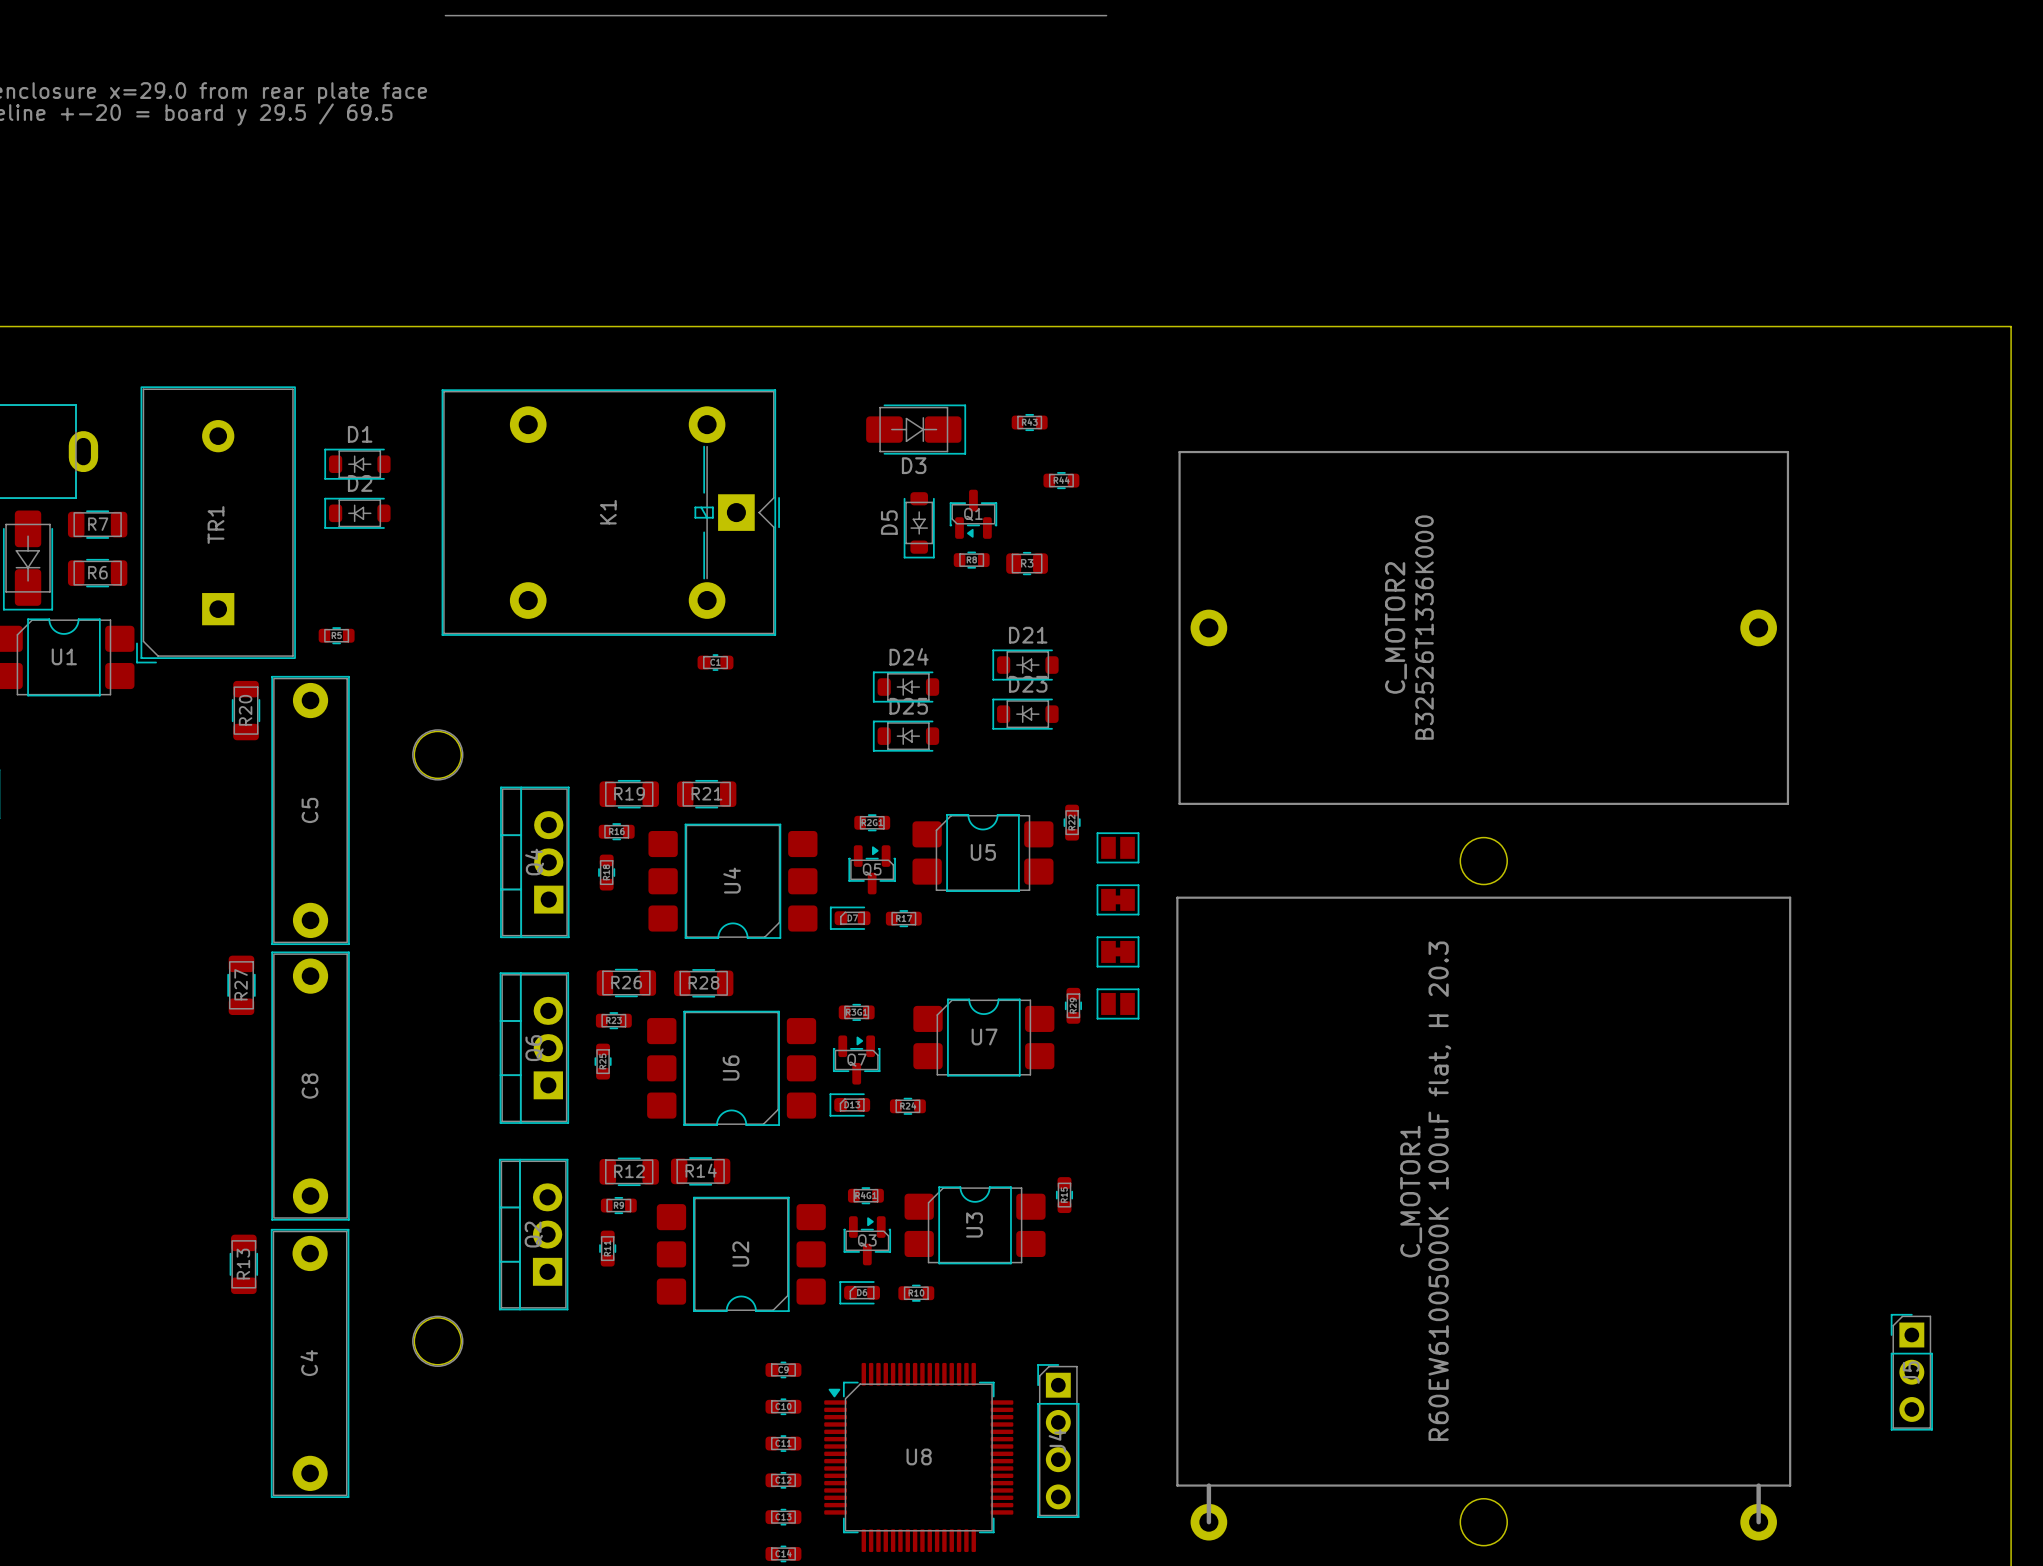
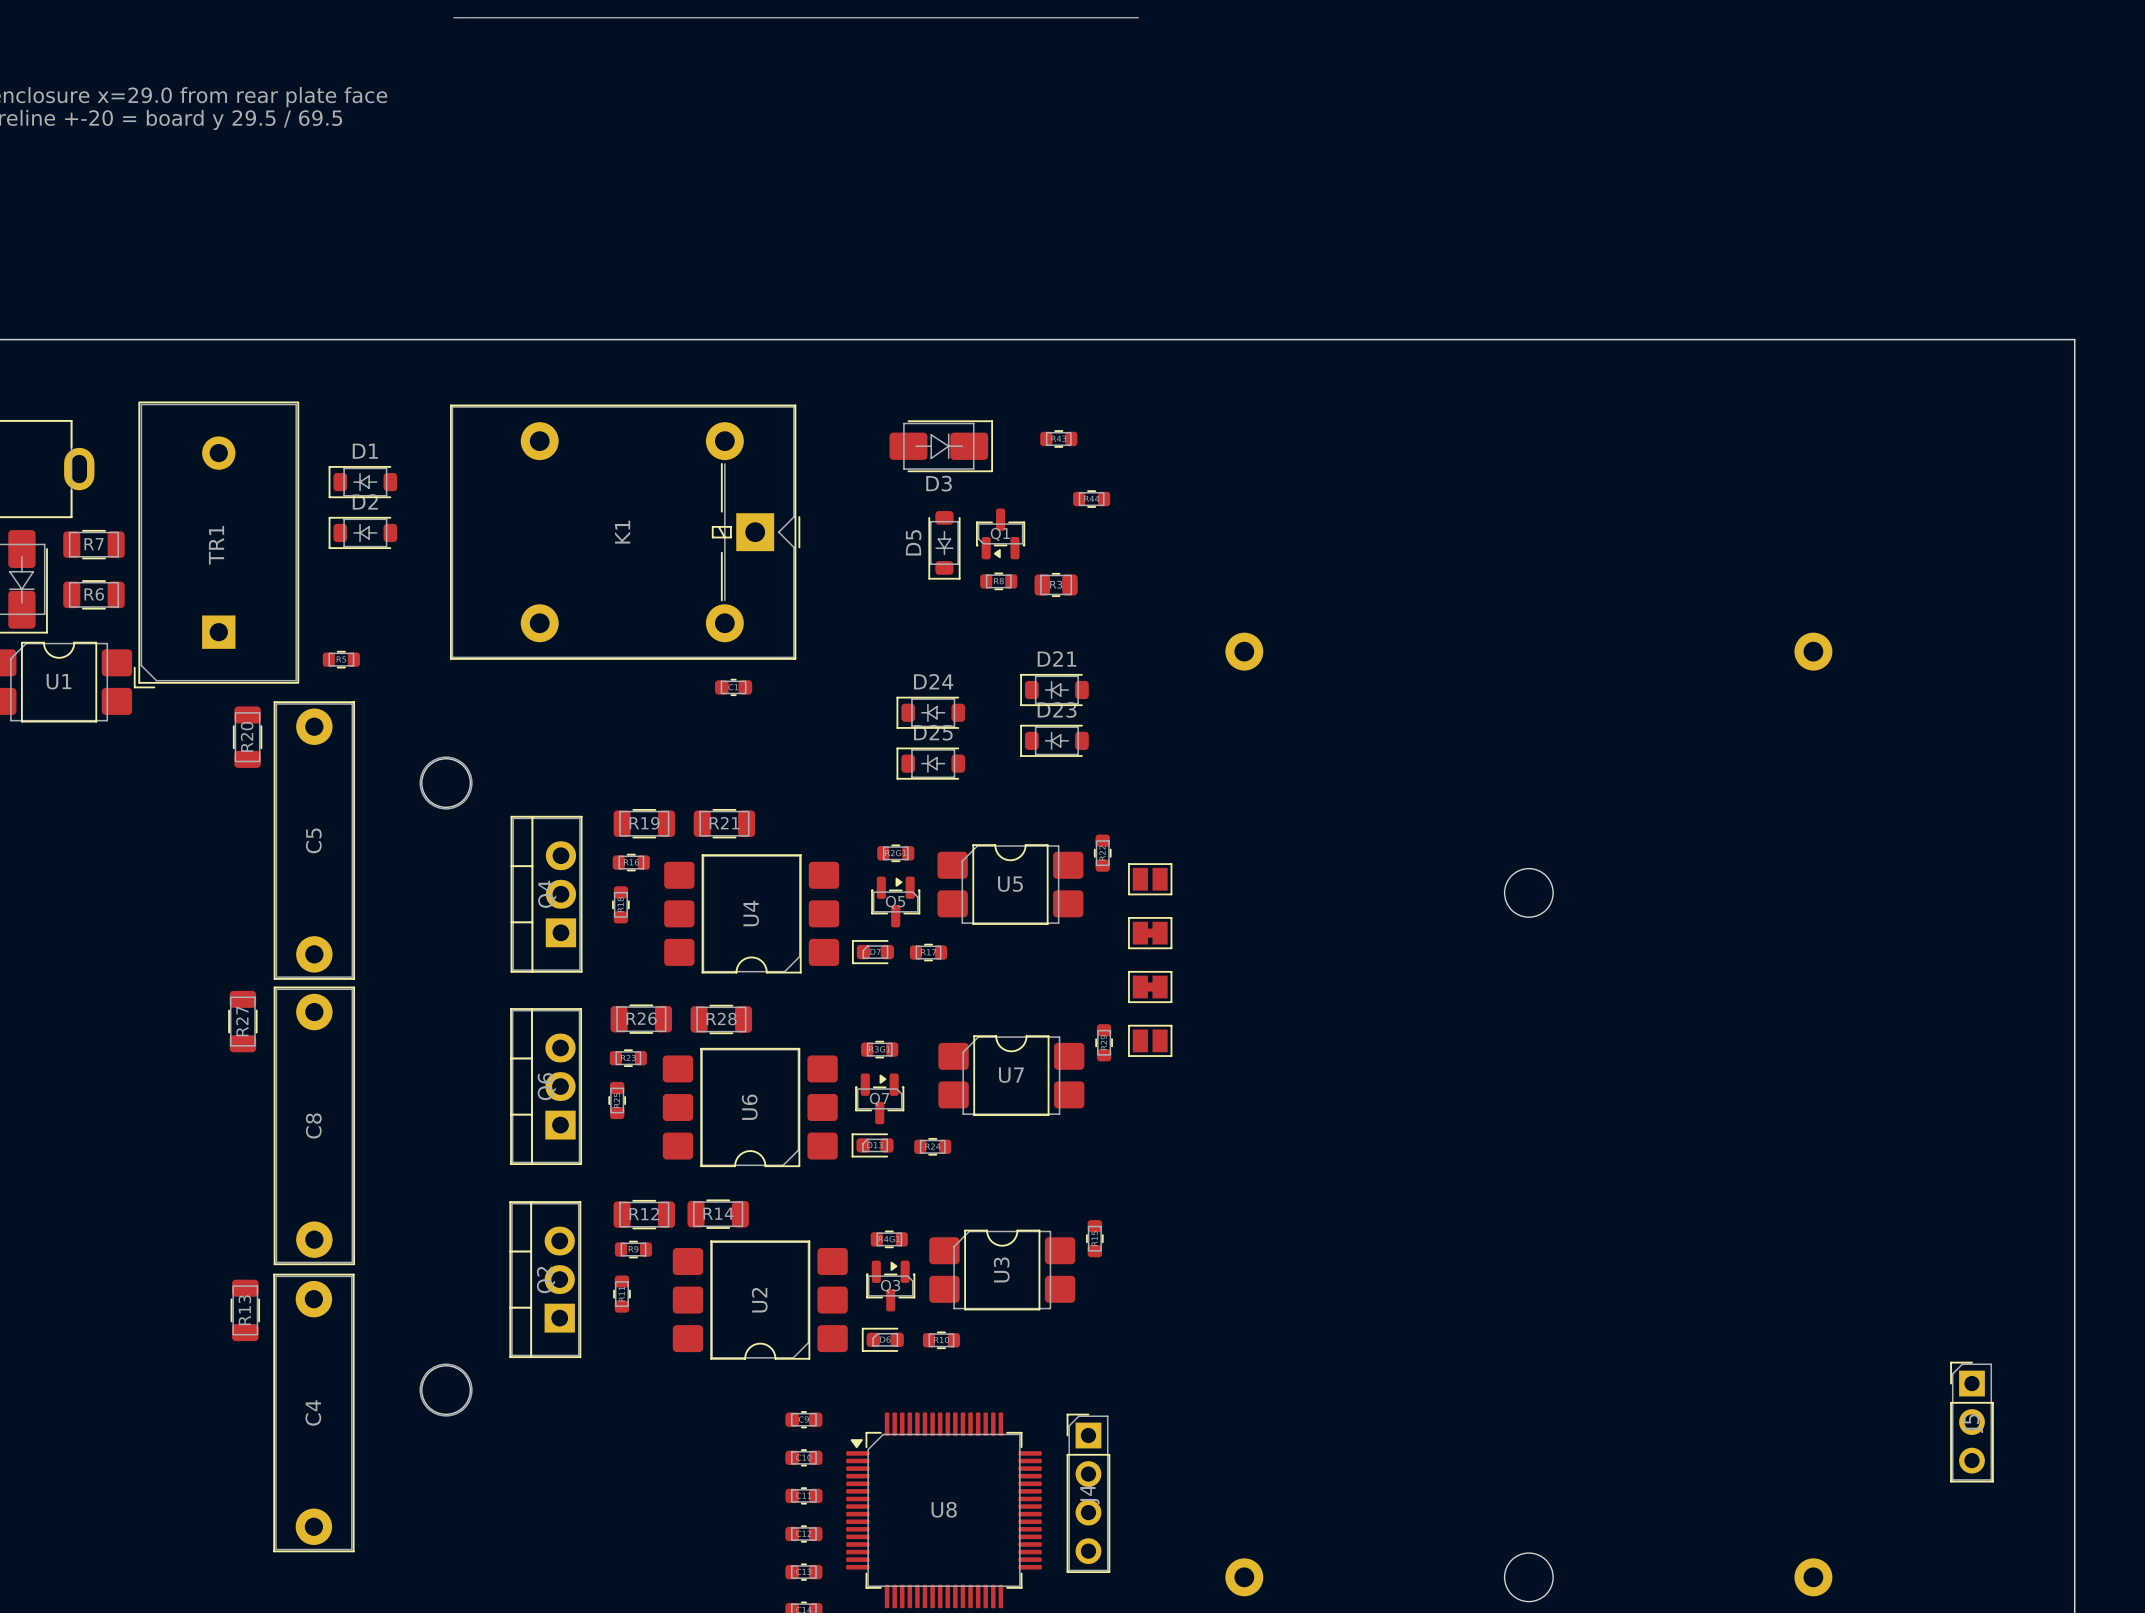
line: (1179, 452) (1787, 452) (1787, 803) (1179, 803) (1179, 452) -> none
text: C_MOTOR2 (1395, 627) -> none
text: B32526T1336K000 (1424, 627) -> none
line: (1177, 897) (1790, 897) (1790, 1485) (1177, 1485) (1177, 897) -> none
text: C_MOTOR1 (1411, 1191) -> none
text: R60EW61005000K 100uF flat, H 20.3 (1439, 1191) -> none
line: (1208, 1485) (1208, 1522) -> none
line: (1758, 1485) (1758, 1522) -> none

